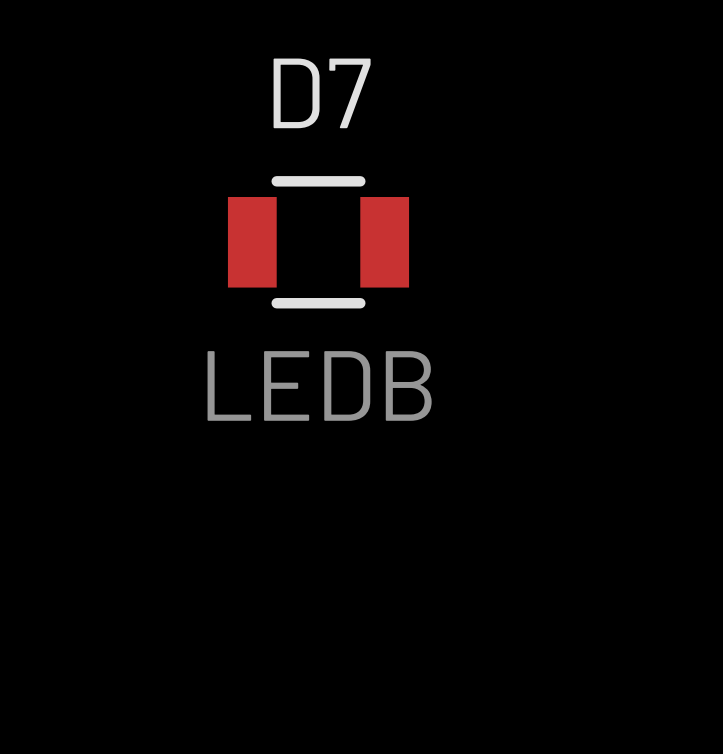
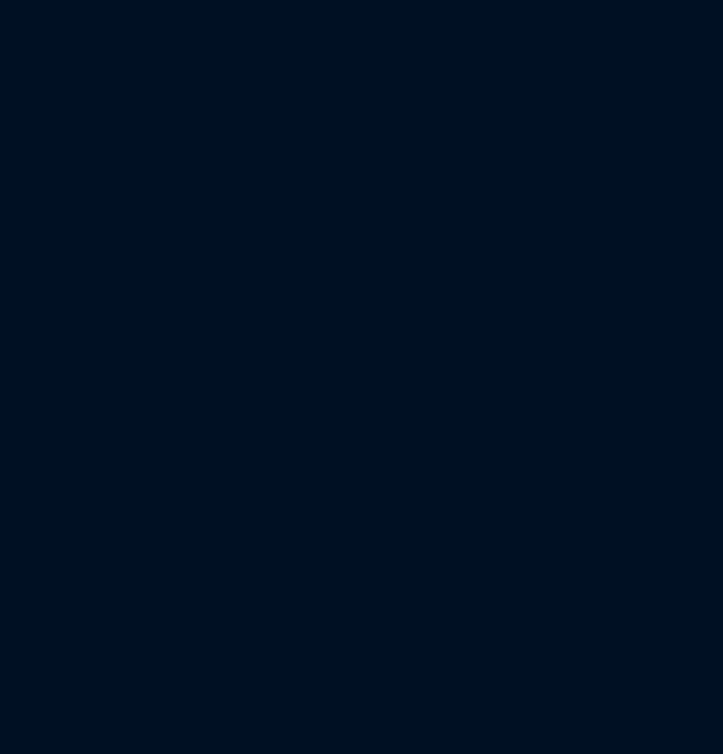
D7: LEDB (318, 242) -> none

